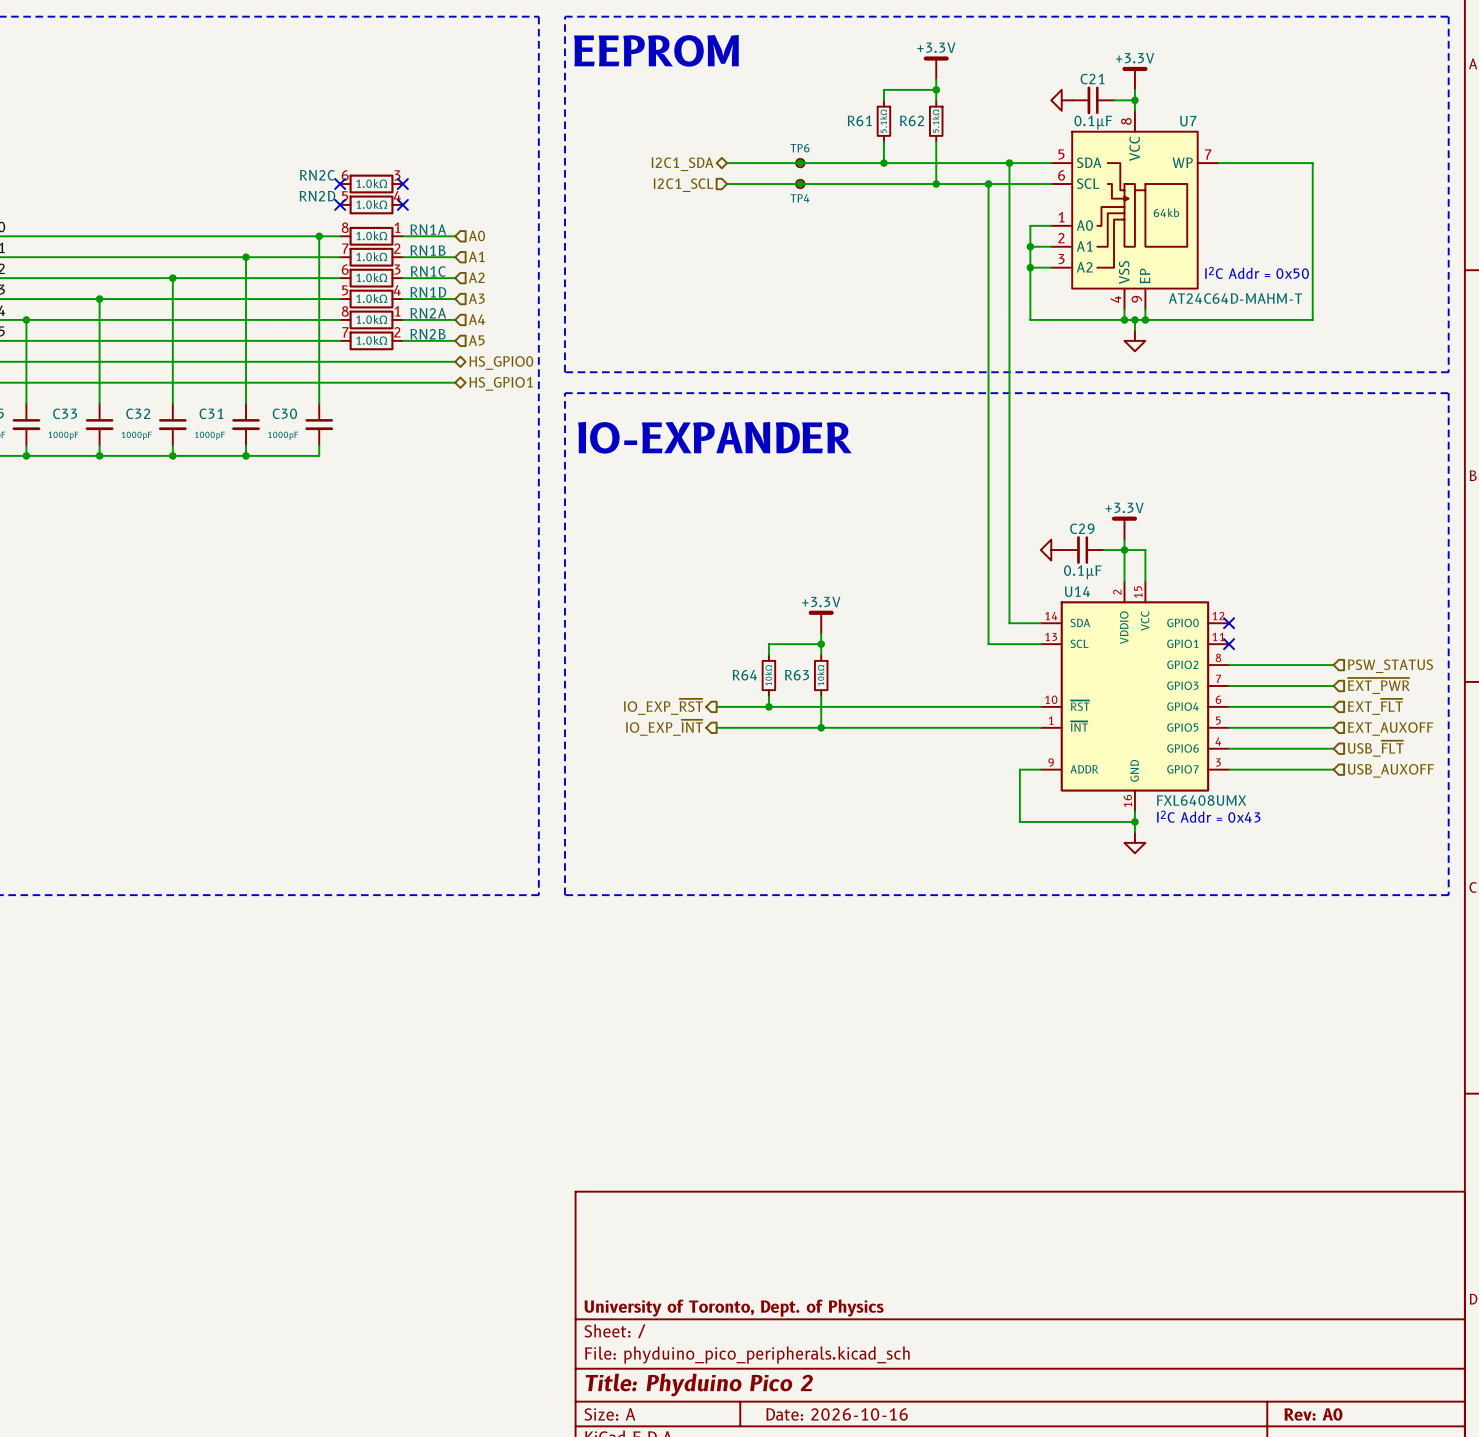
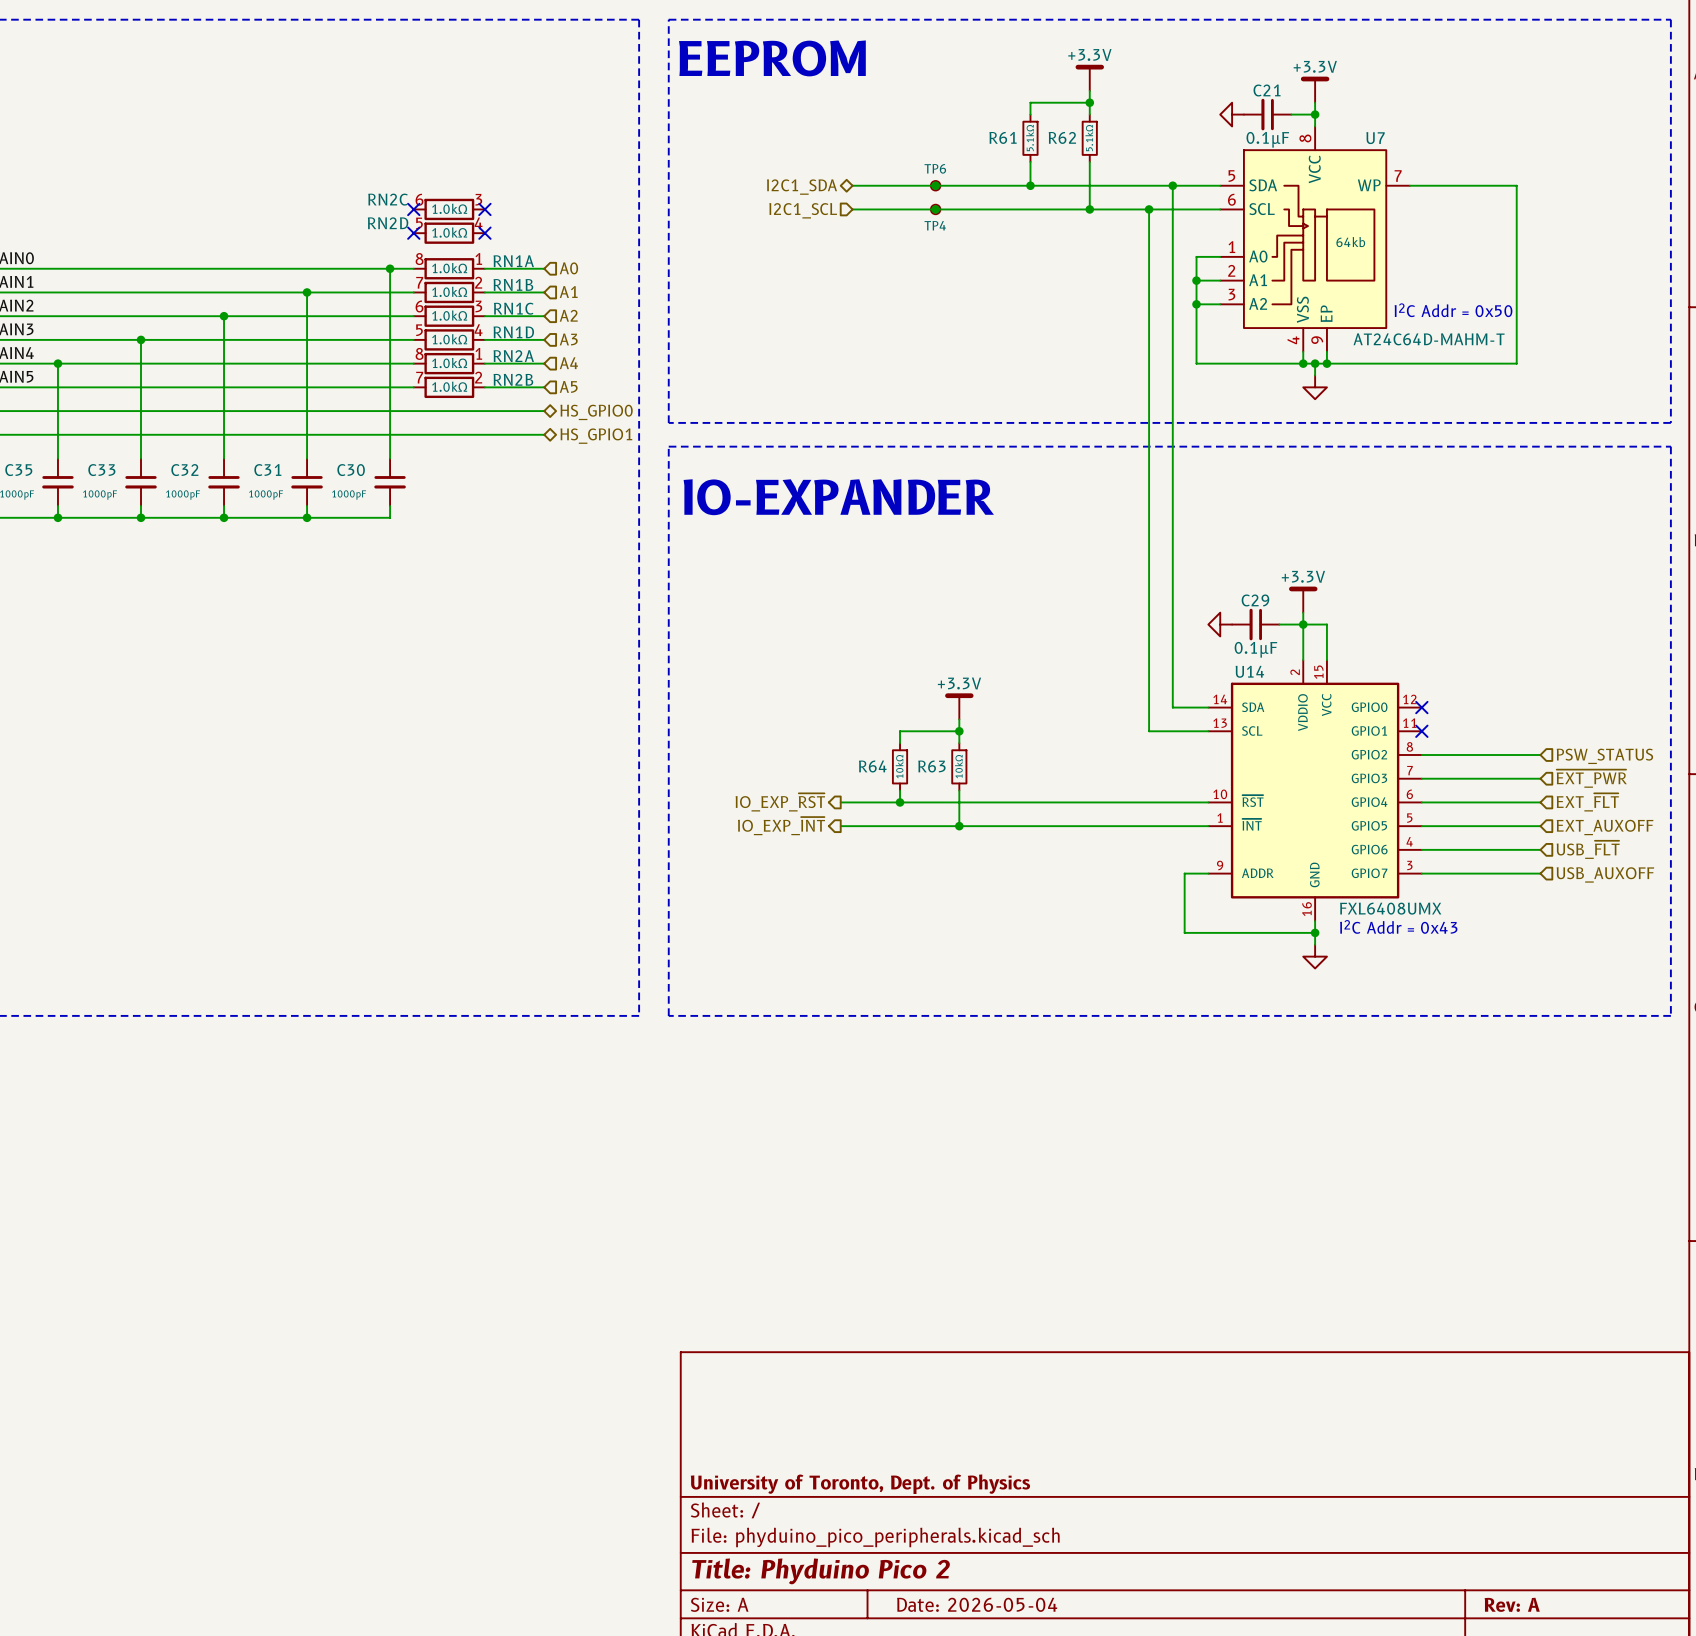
title block: Date: 2026-10-16 (837, 1414) -> Date: 2026-05-04 (977, 1604)
title block: Rev: A0 (1313, 1414) -> Rev: A (1512, 1604)

